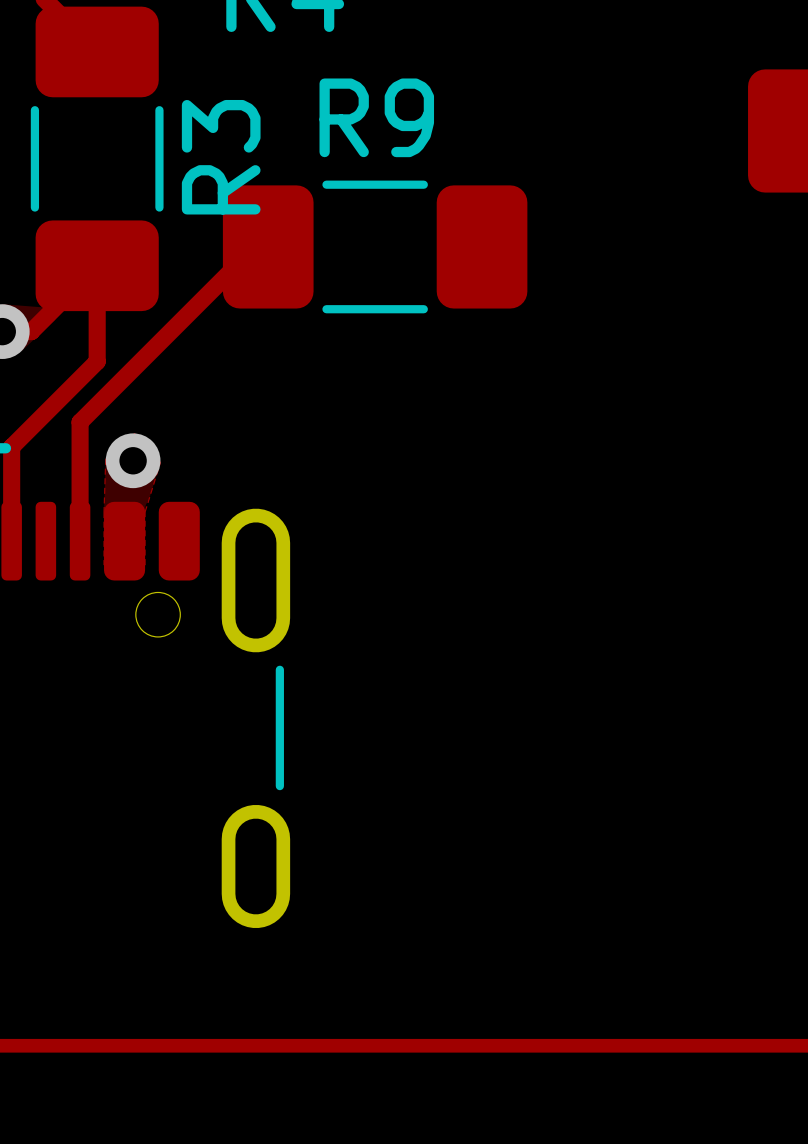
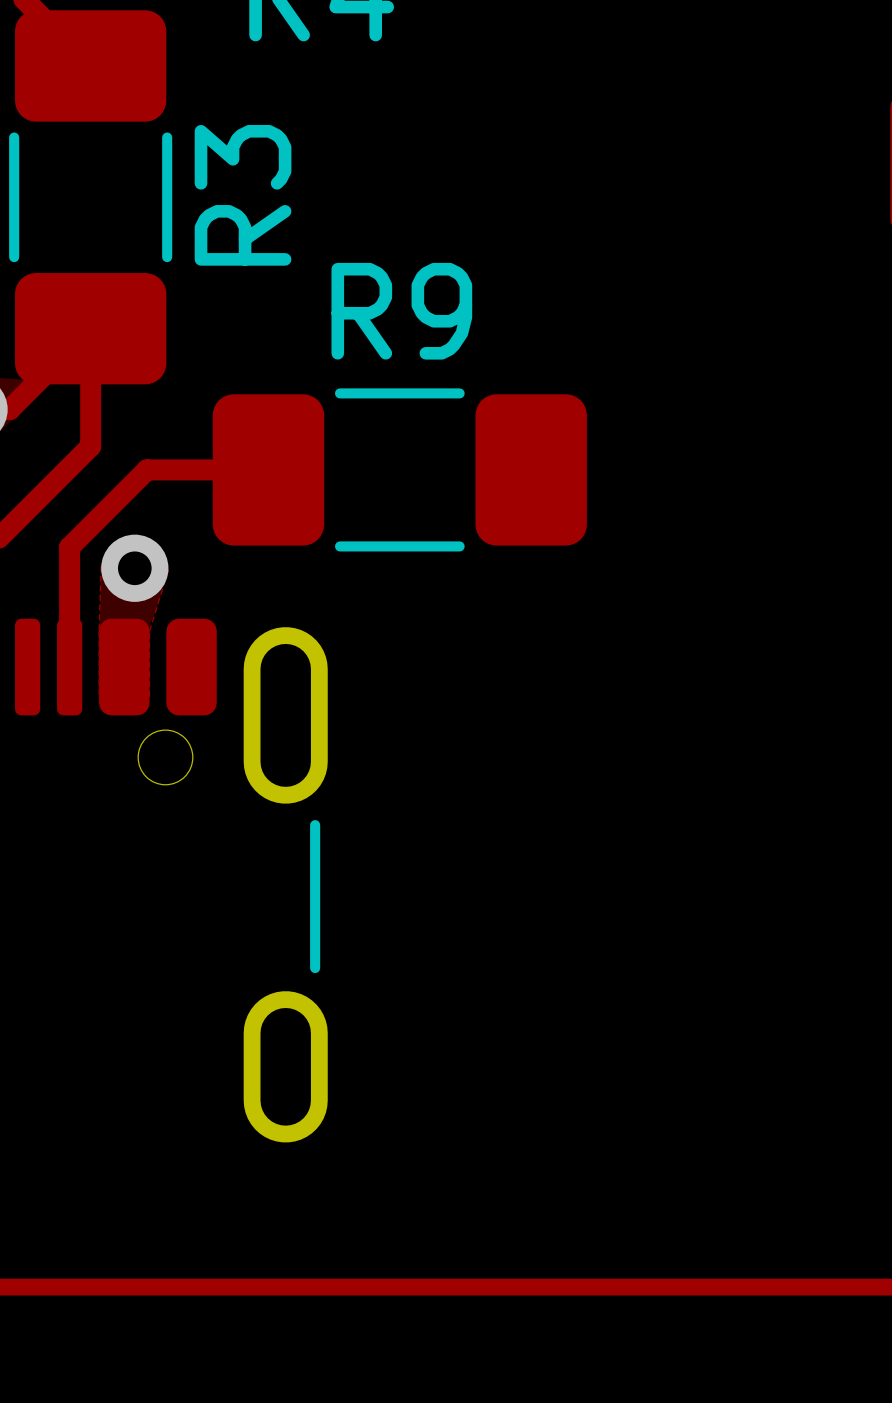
top track: (268, 246) (255, 246) (80, 422) (80, 443) -> (268, 469) (146, 469) (69, 547)
R9 position: (375, 246) -> (399, 469)

